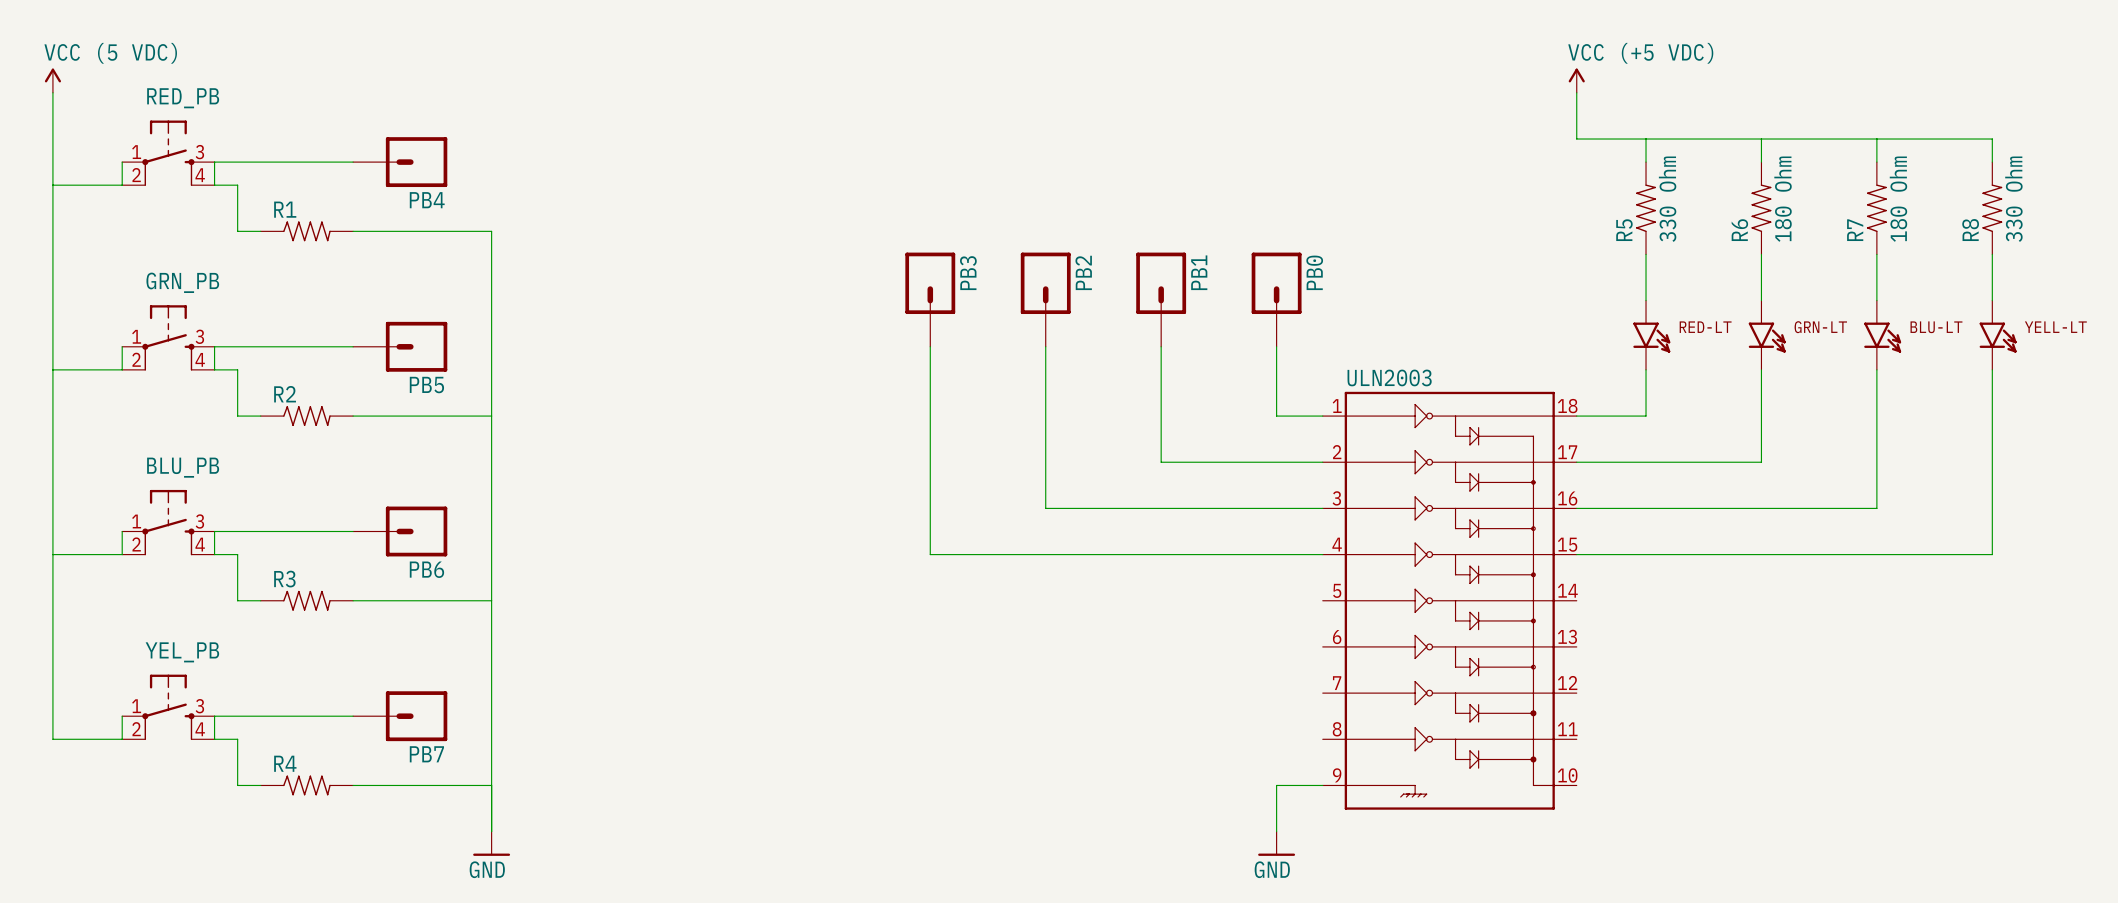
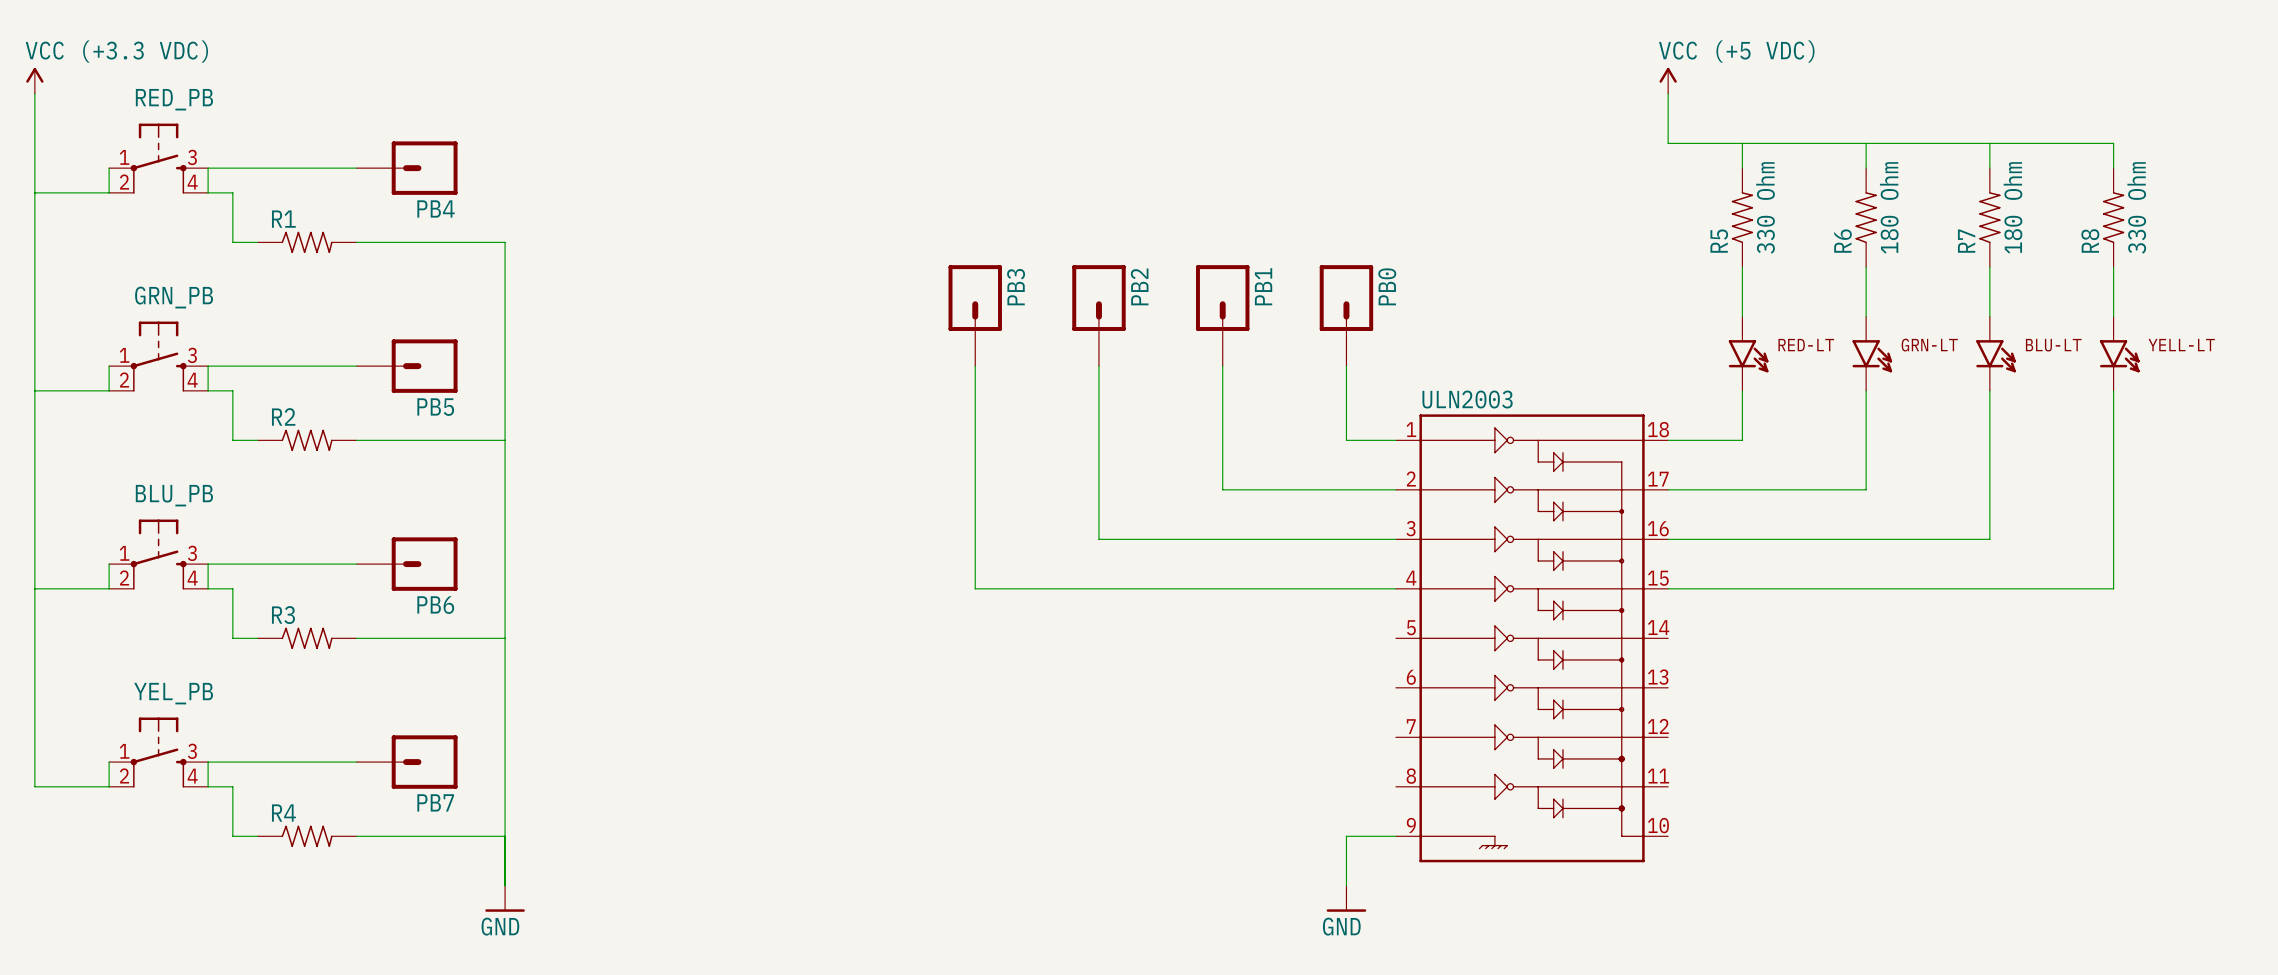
power symbol: VCC (5 VDC) (52, 80) -> VCC (+3.3 VDC) (34, 80)

